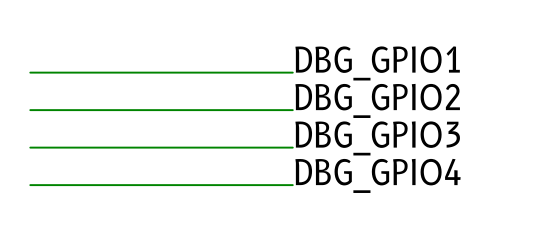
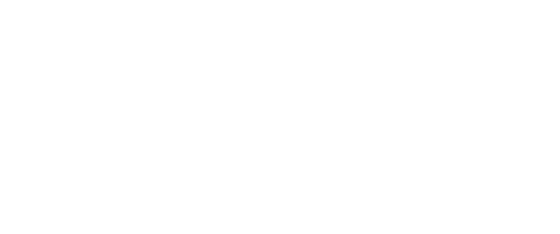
label: DBG_GPIO1 (377, 63) -> none
wire: (30, 72) (292, 72) -> none
label: DBG_GPIO2 (377, 100) -> none
wire: (30, 110) (292, 110) -> none
label: DBG_GPIO3 (377, 138) -> none
wire: (30, 147) (292, 147) -> none
label: DBG_GPIO4 (378, 175) -> none
wire: (30, 185) (292, 185) -> none

